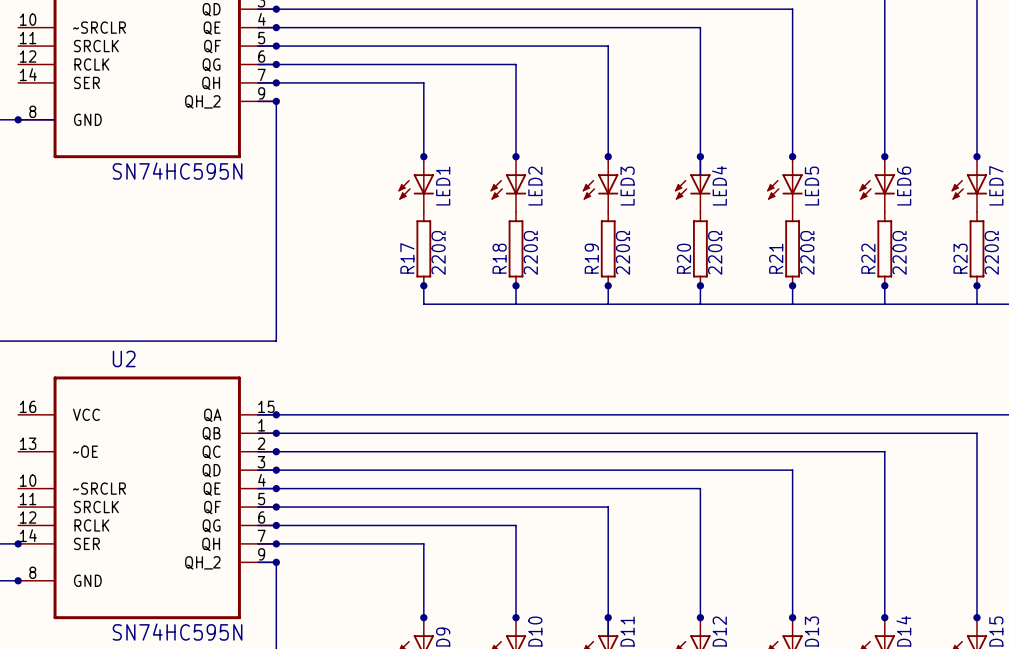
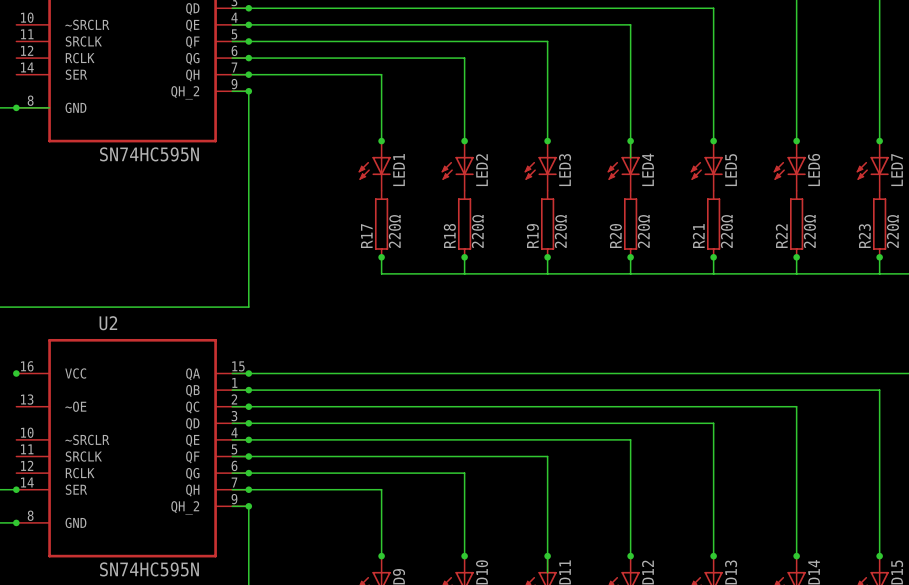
junction: none -> (16, 373)

